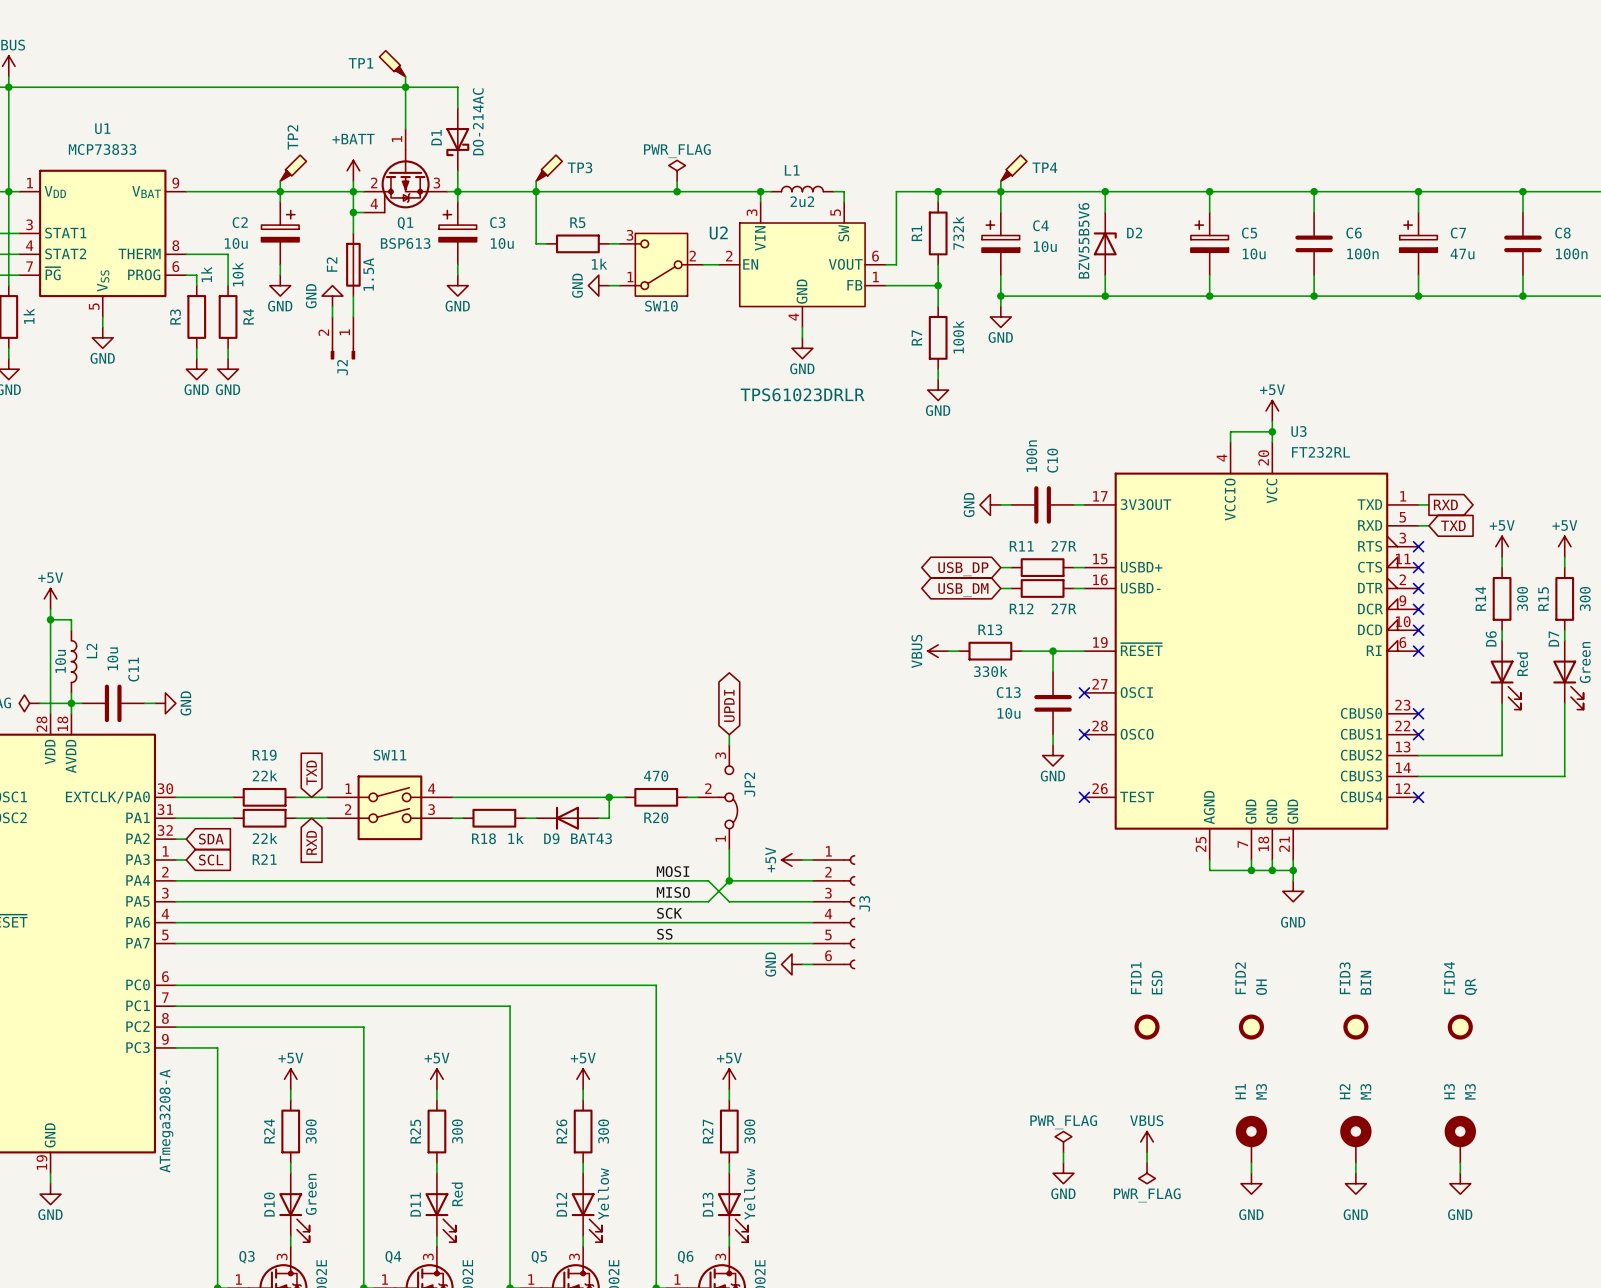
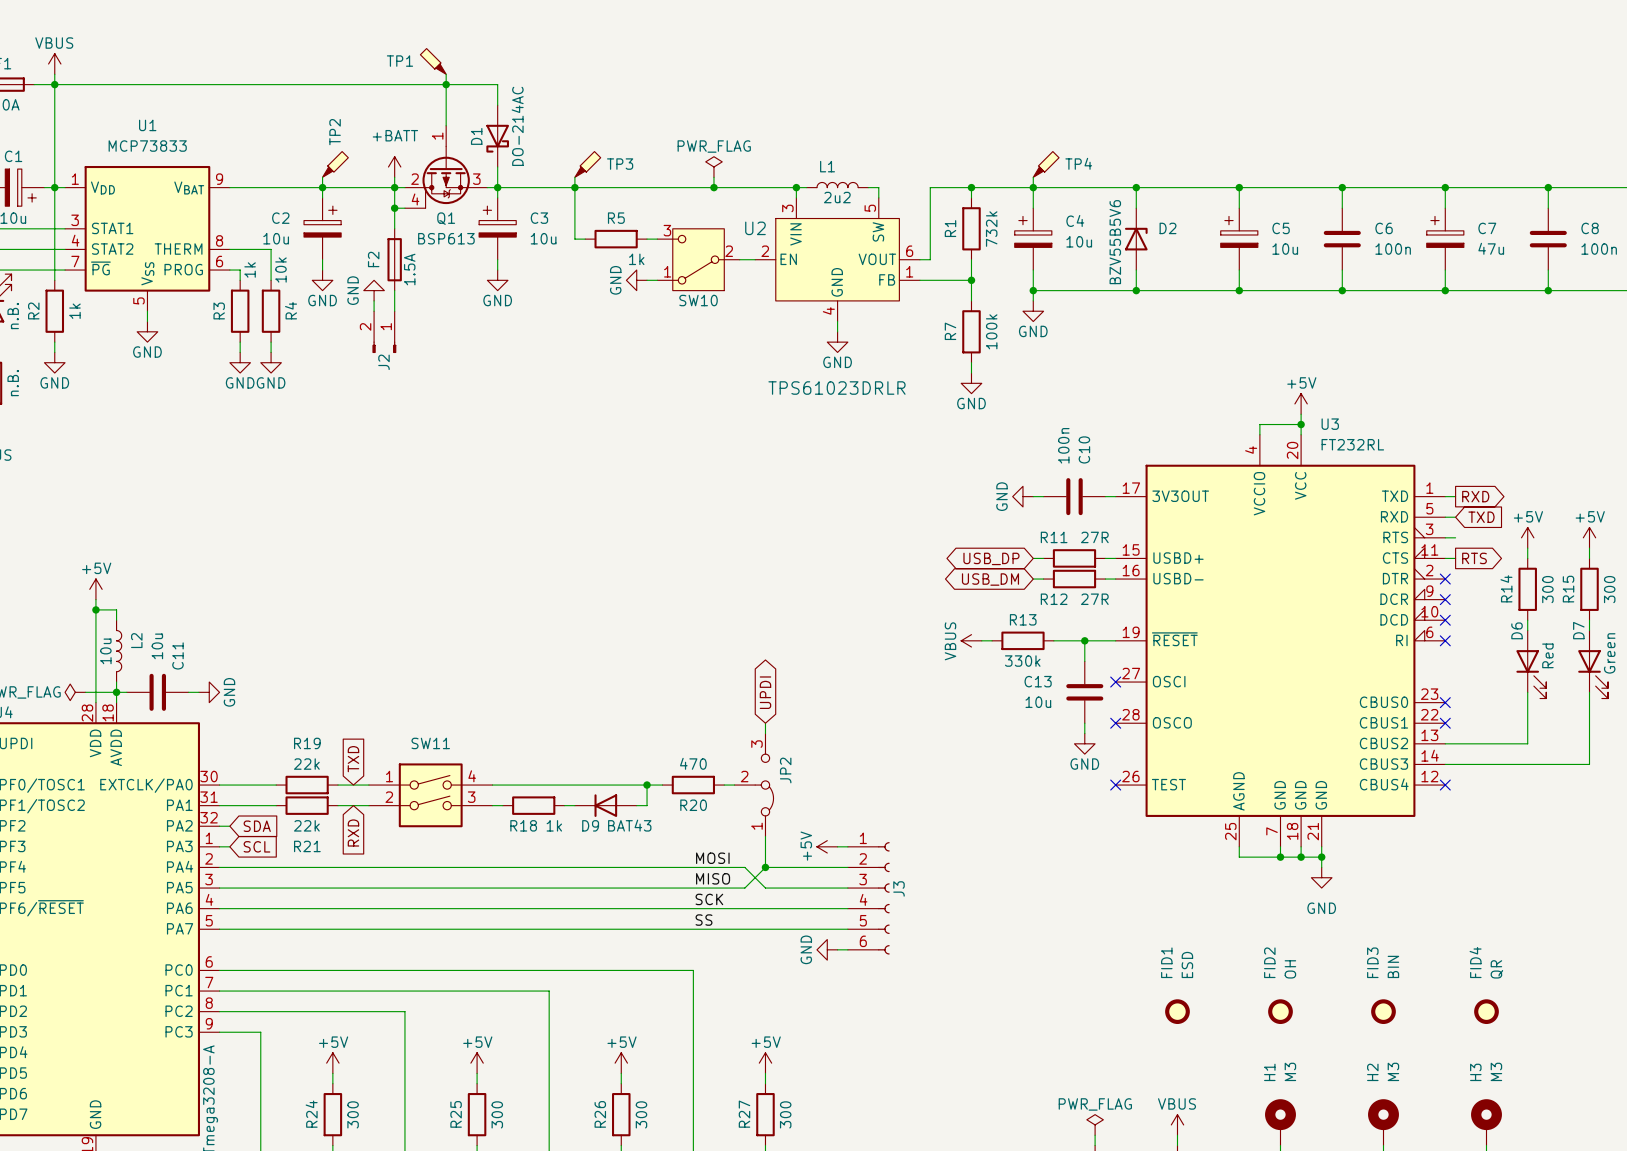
wire: none -> (1445, 537) (1455, 537)
no-connect mark: (1418, 546) -> none
wire: none -> (1445, 558) (1455, 558)
no-connect mark: (1418, 567) -> none
global label: none -> RTS (1474, 558)

